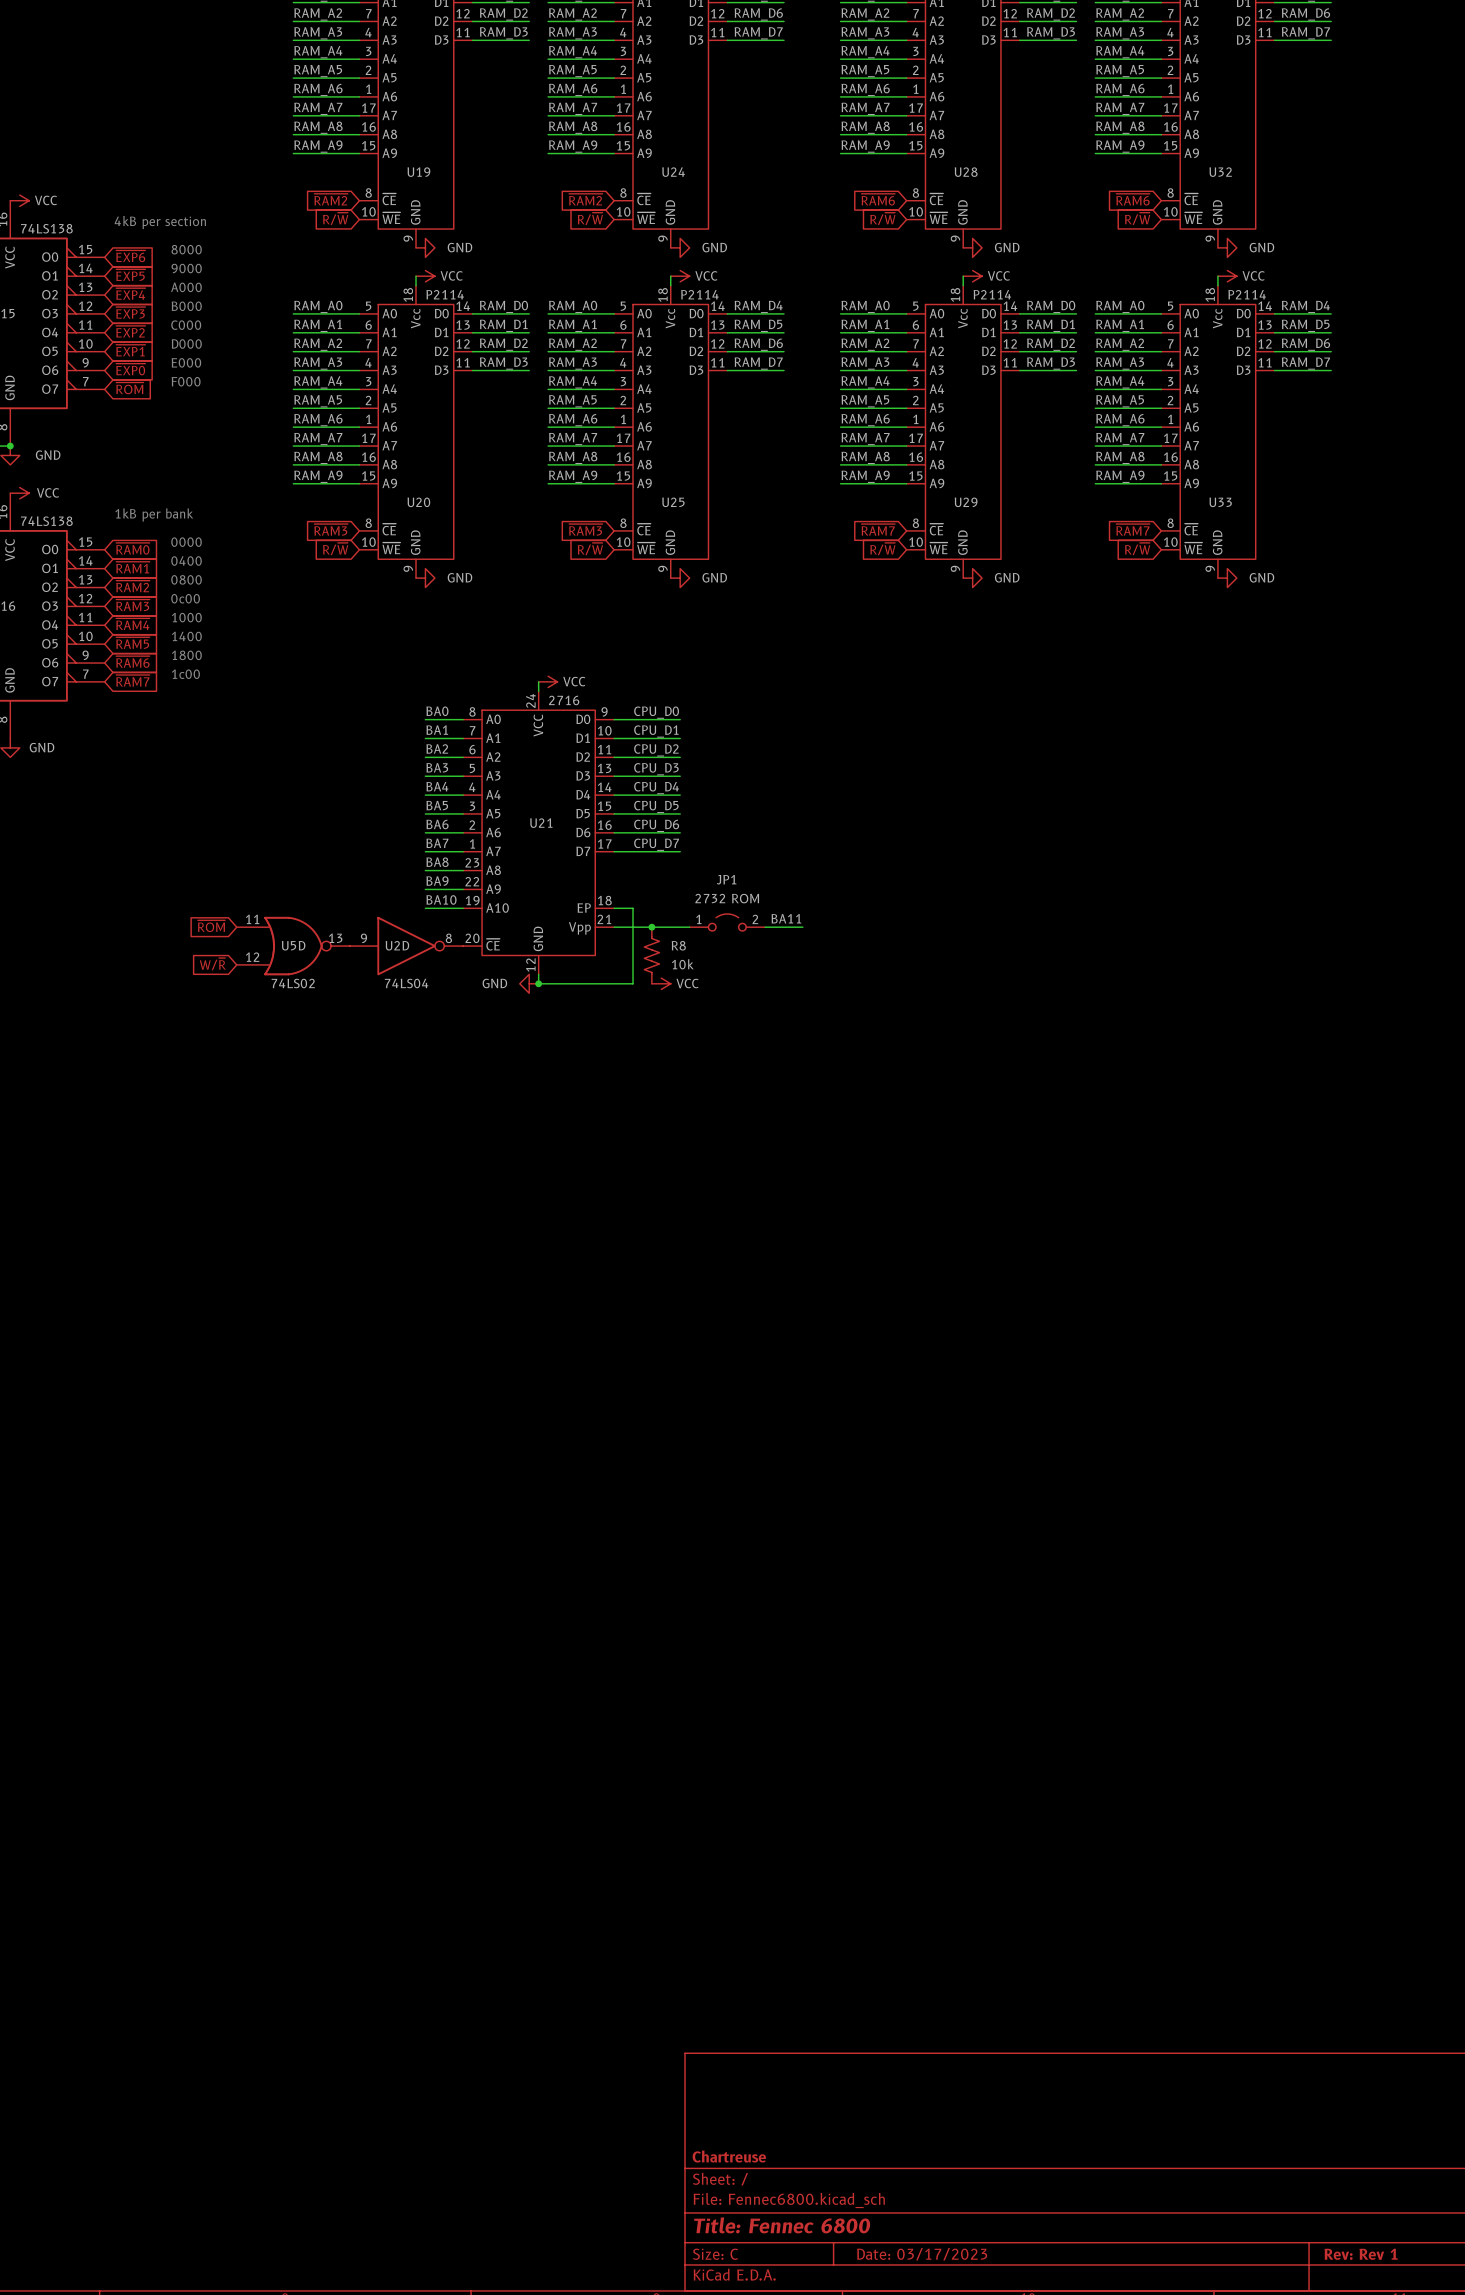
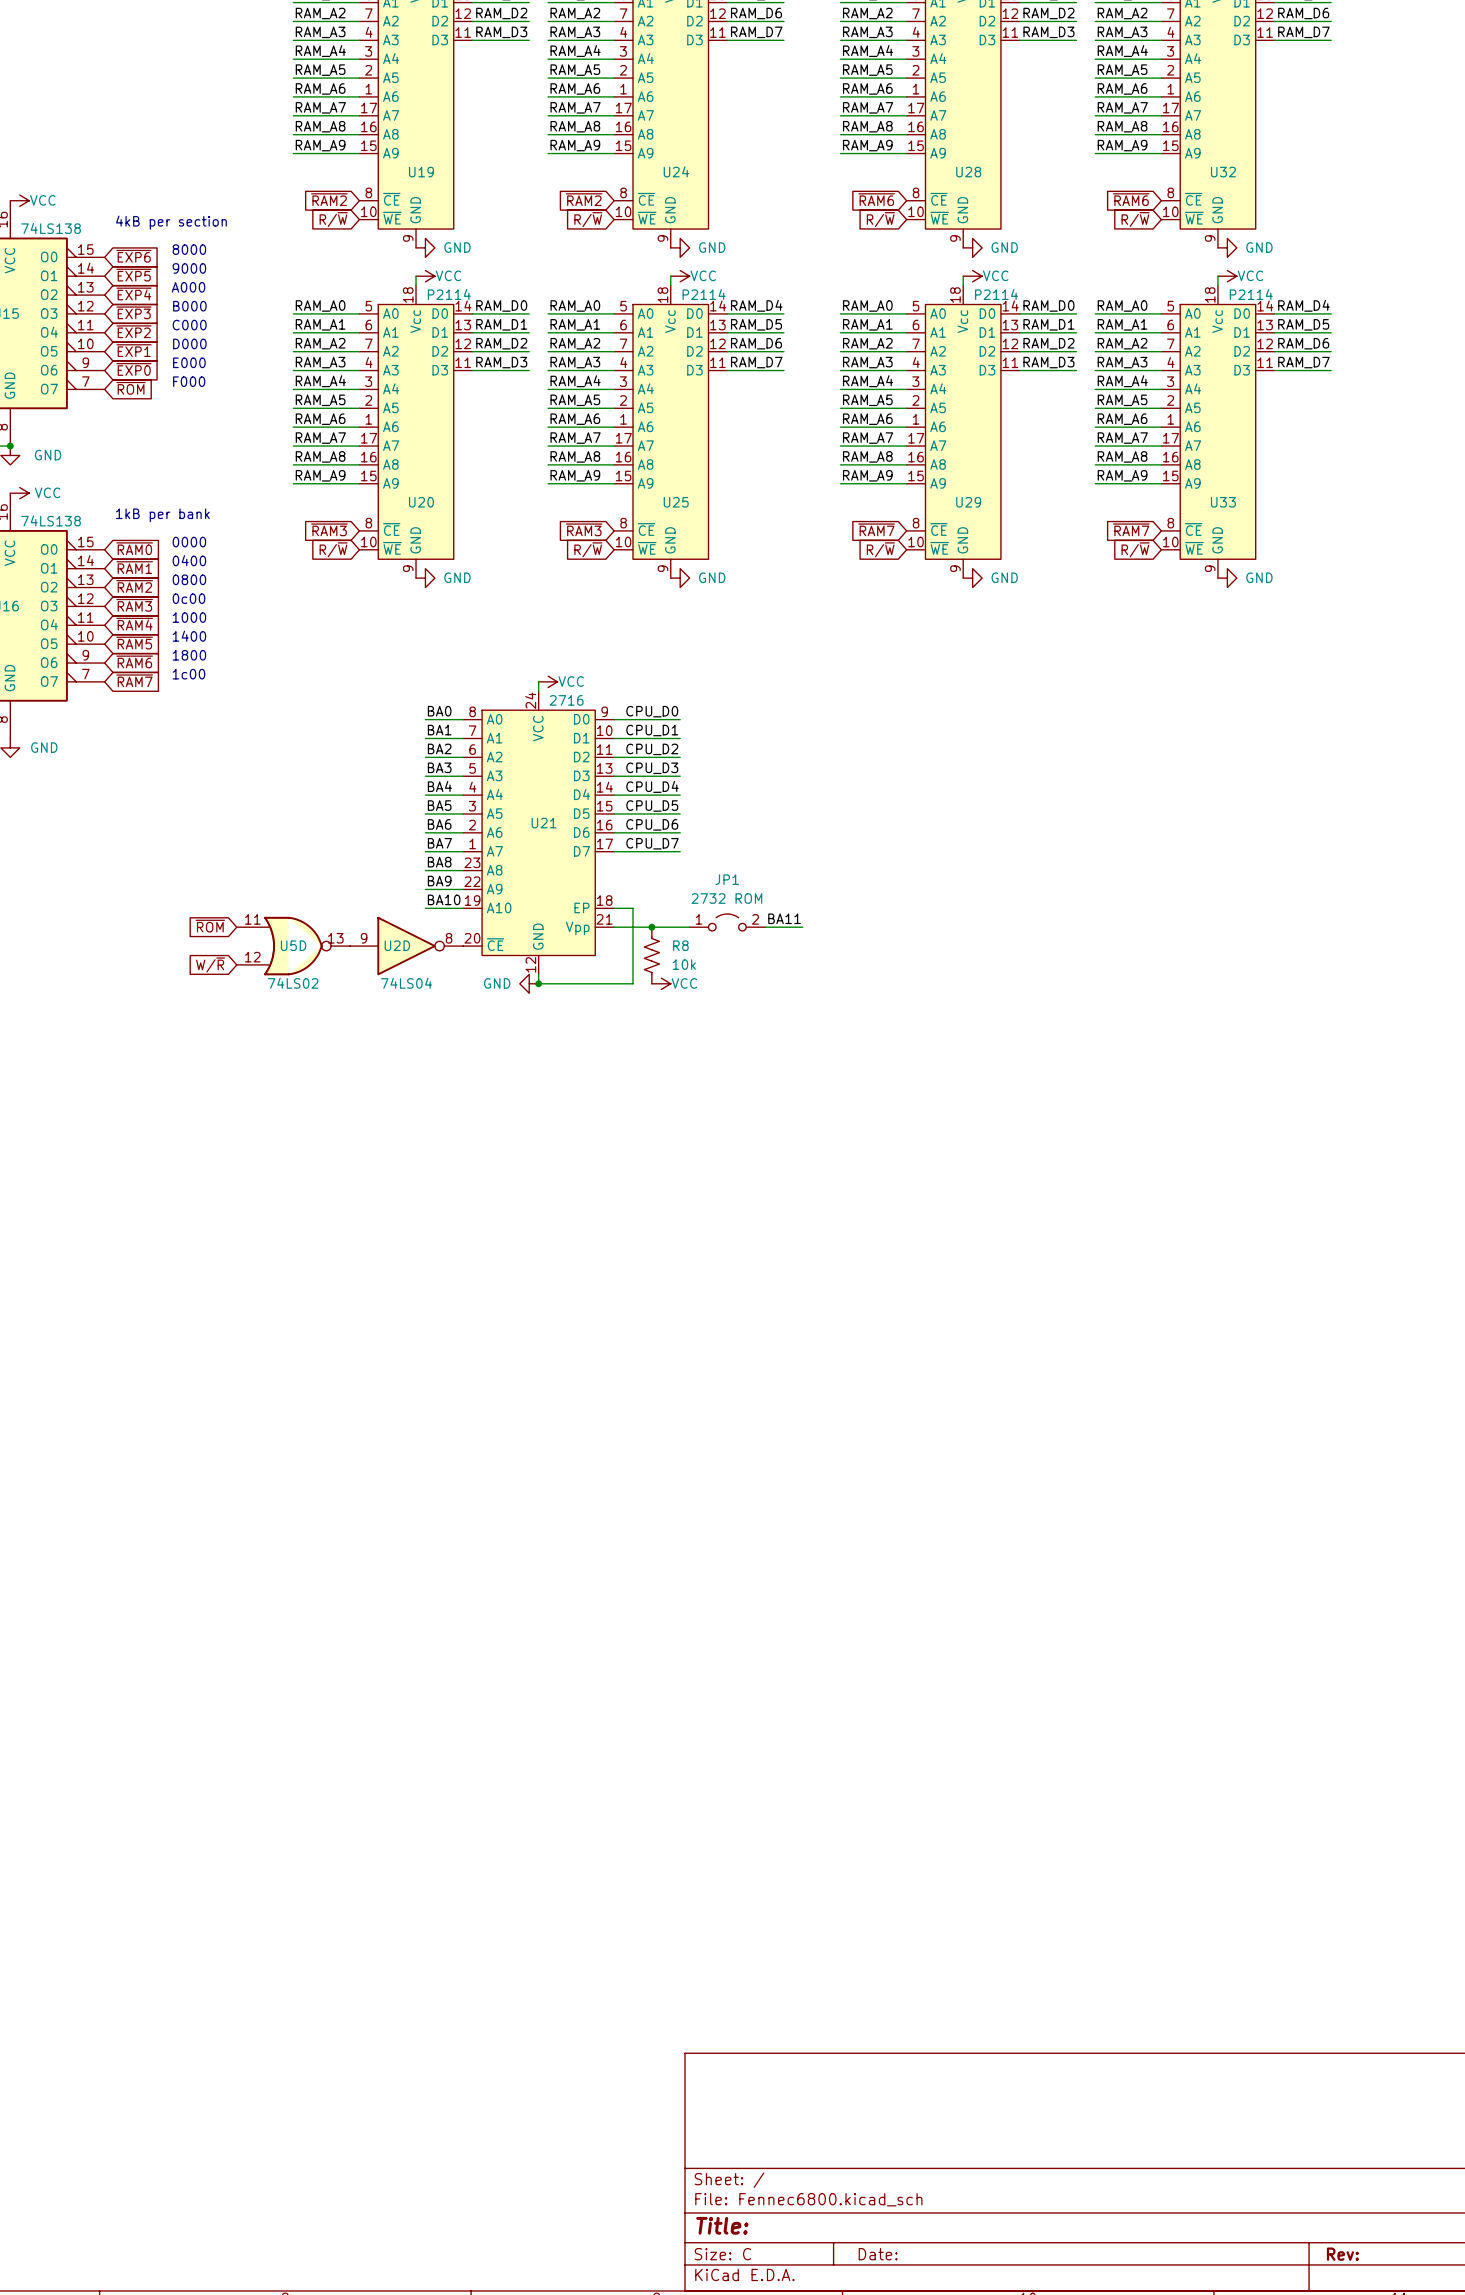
title block: Chartreuse (729, 2156) -> none
title block: Title: Fennec 6800 (782, 2225) -> Title: (722, 2225)
title block: Date: 03/17/2023 (922, 2254) -> Date: (878, 2254)
title block: Rev: Rev 1 (1361, 2254) -> Rev: (1342, 2254)

